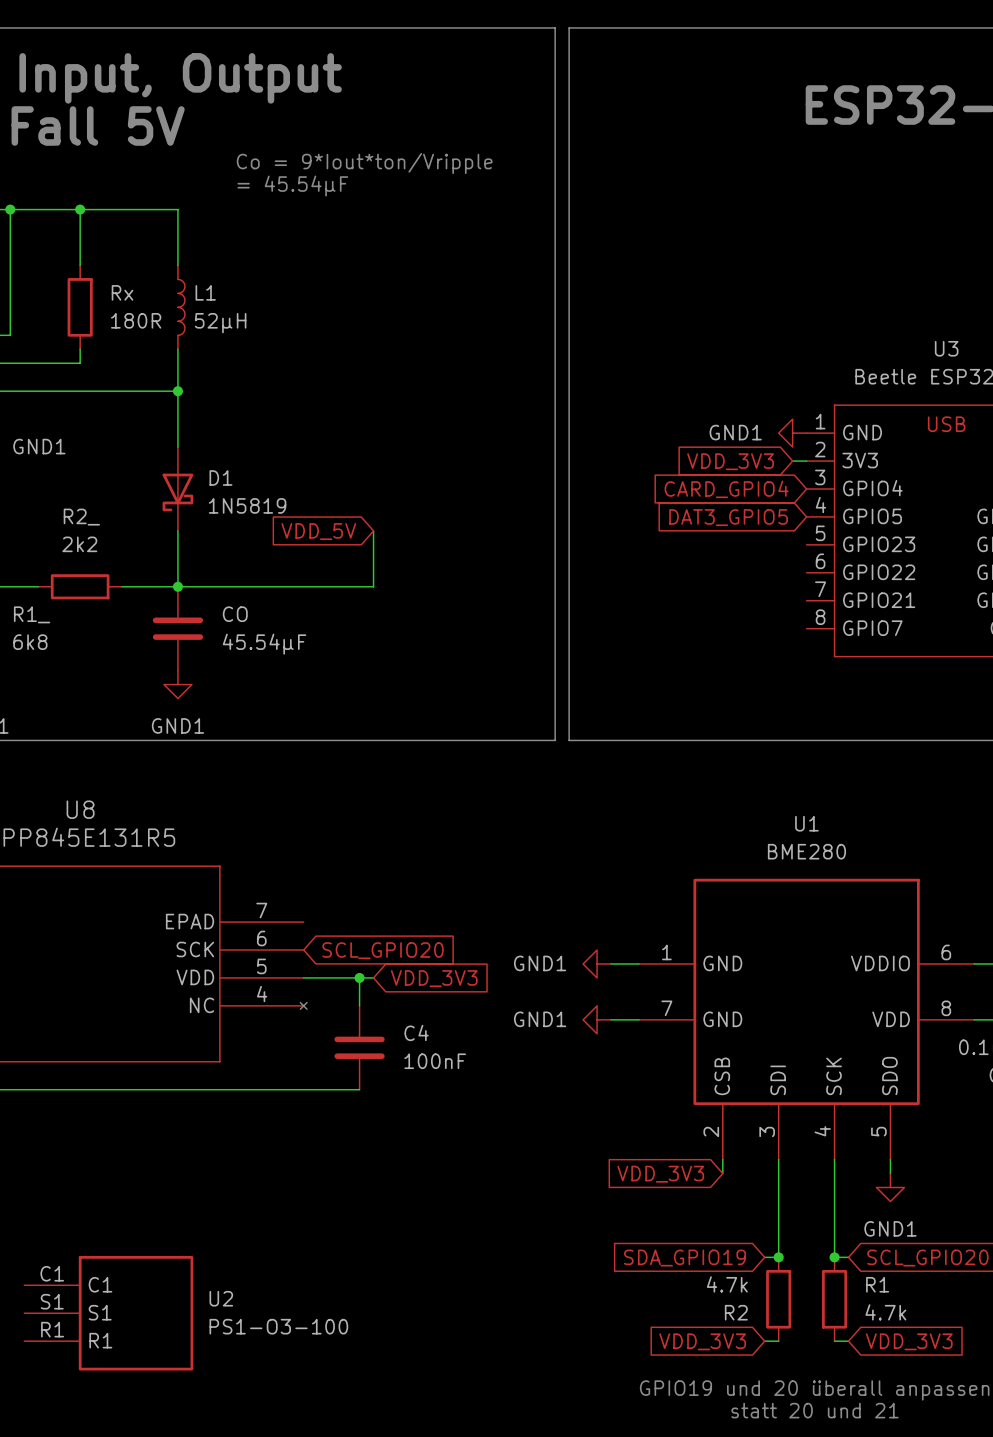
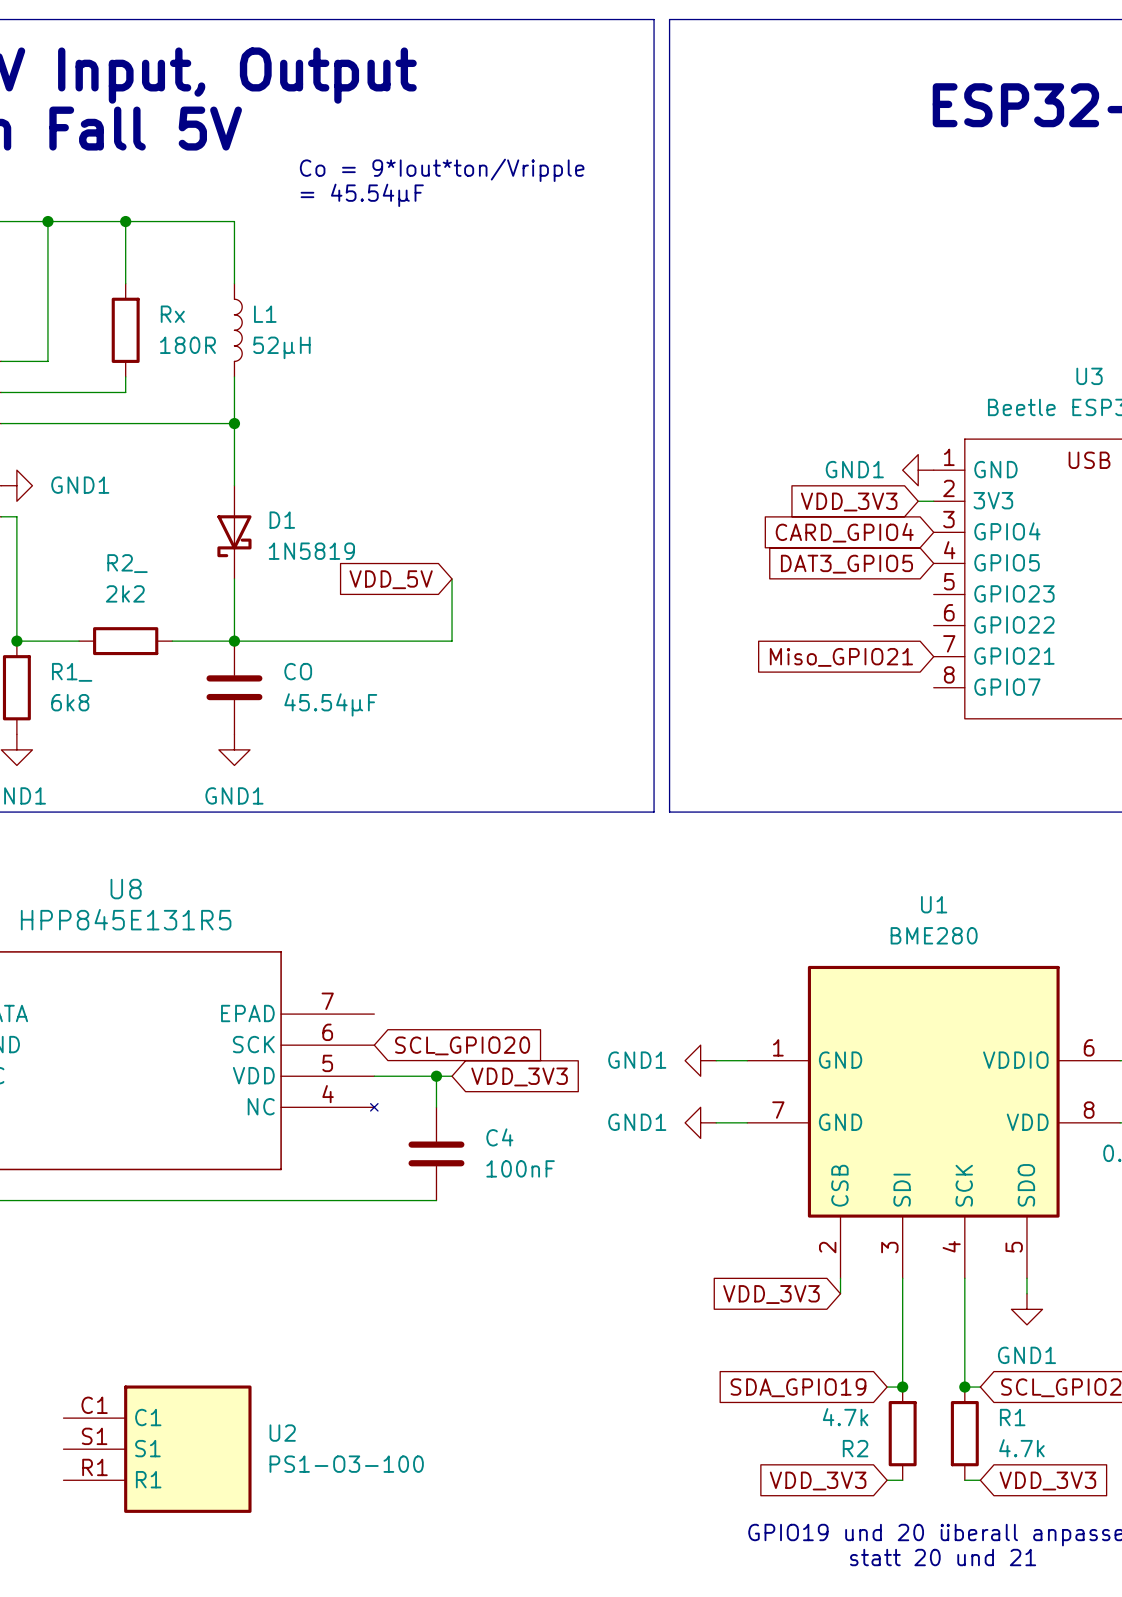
global label: none -> Miso_GPIO21 (841, 657)

